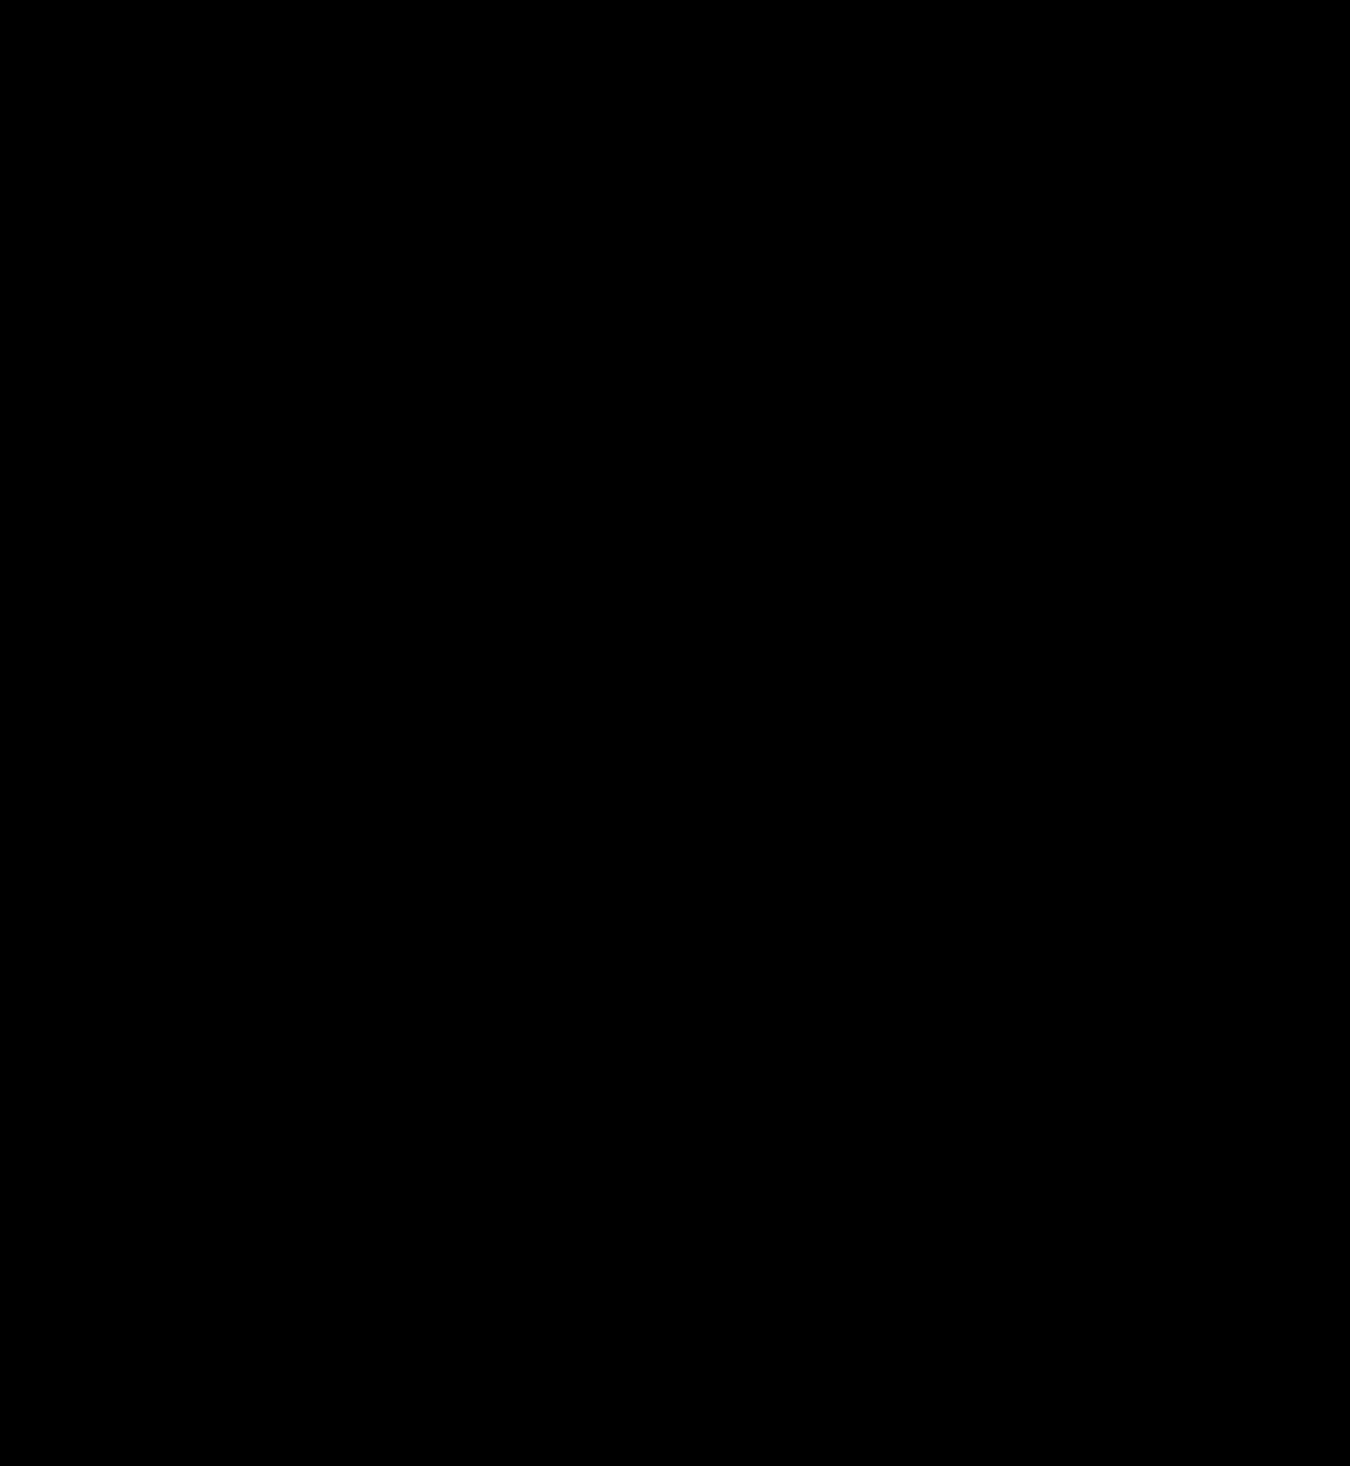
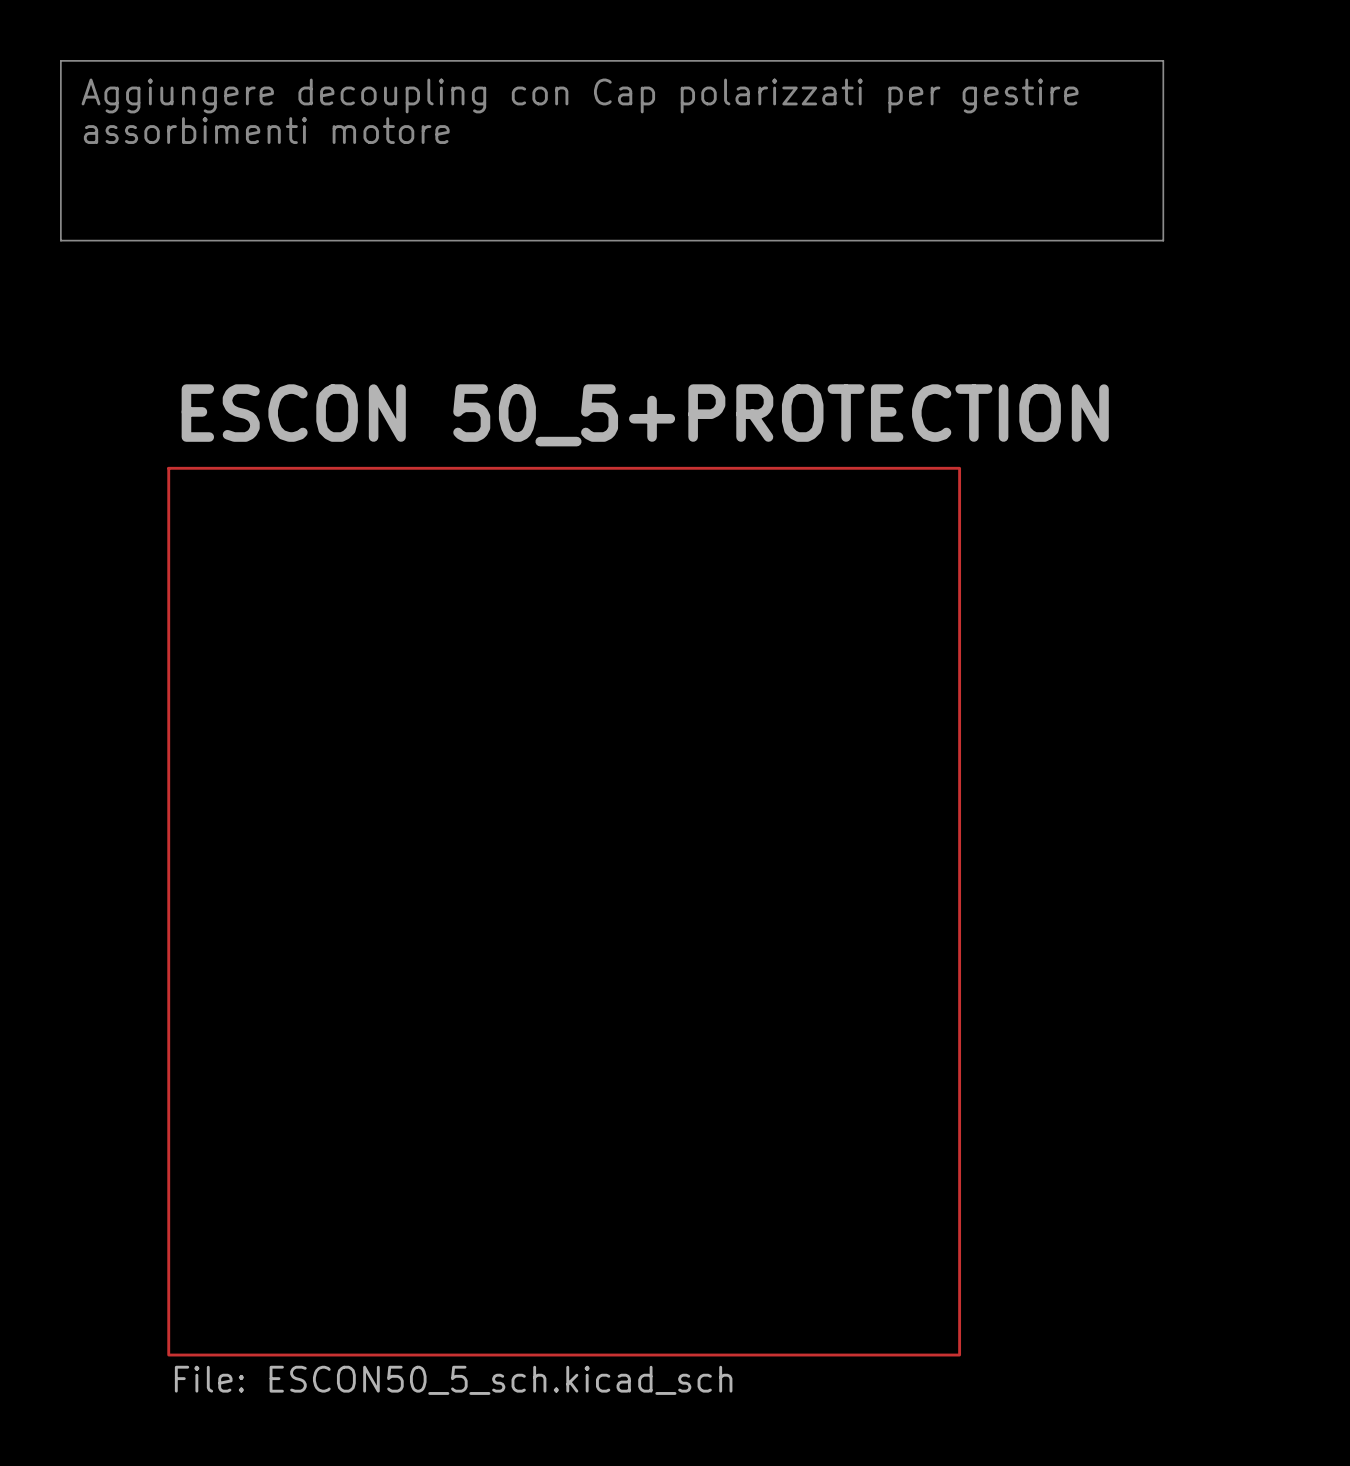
line: none -> (60, 60) (1163, 60) (1163, 240) (60, 240) (60, 60)
text: none -> Aggiungere decoupling con Cap polarizzati per gestire (580, 95)
text: none -> assorbimenti motore (266, 130)
sheet ESCON 50_5+PROTECTION: none -> File: ESCON50_5_sch.kicad_sch (564, 911)

